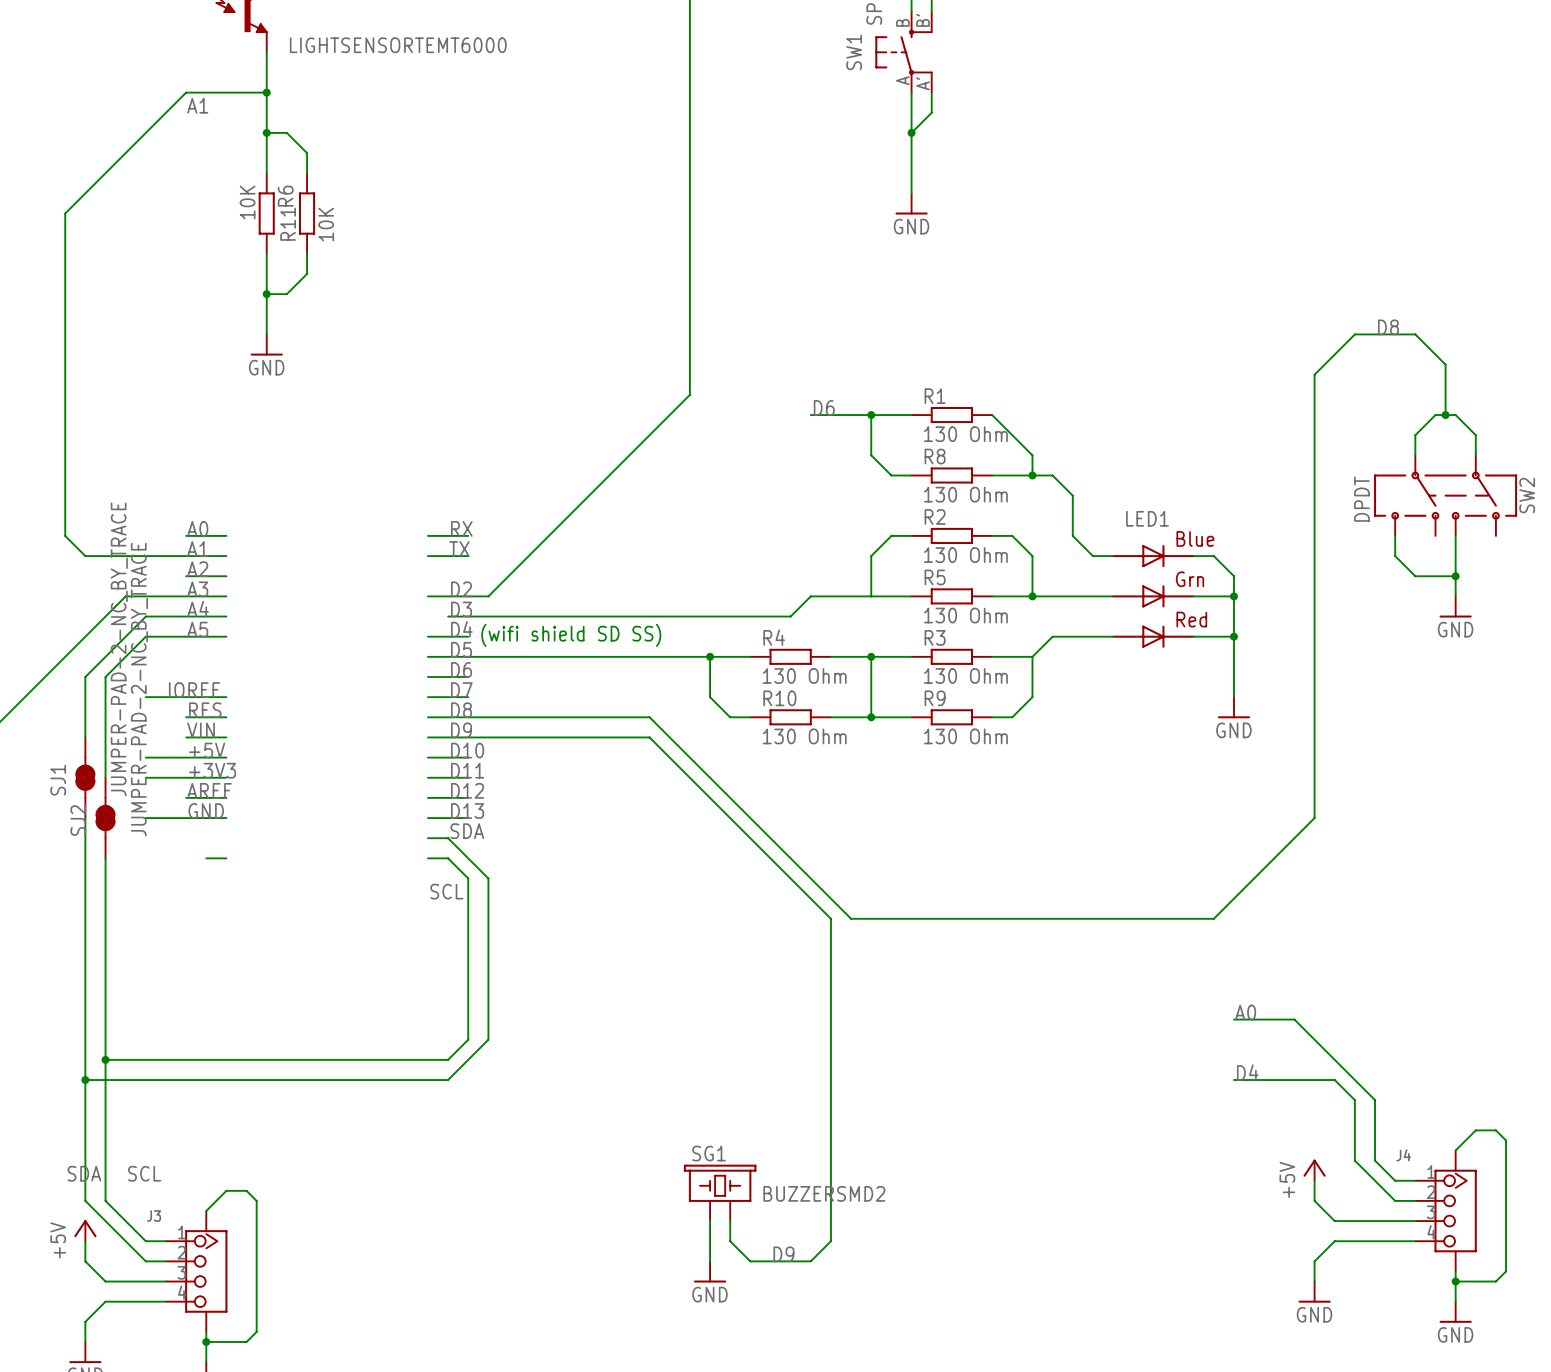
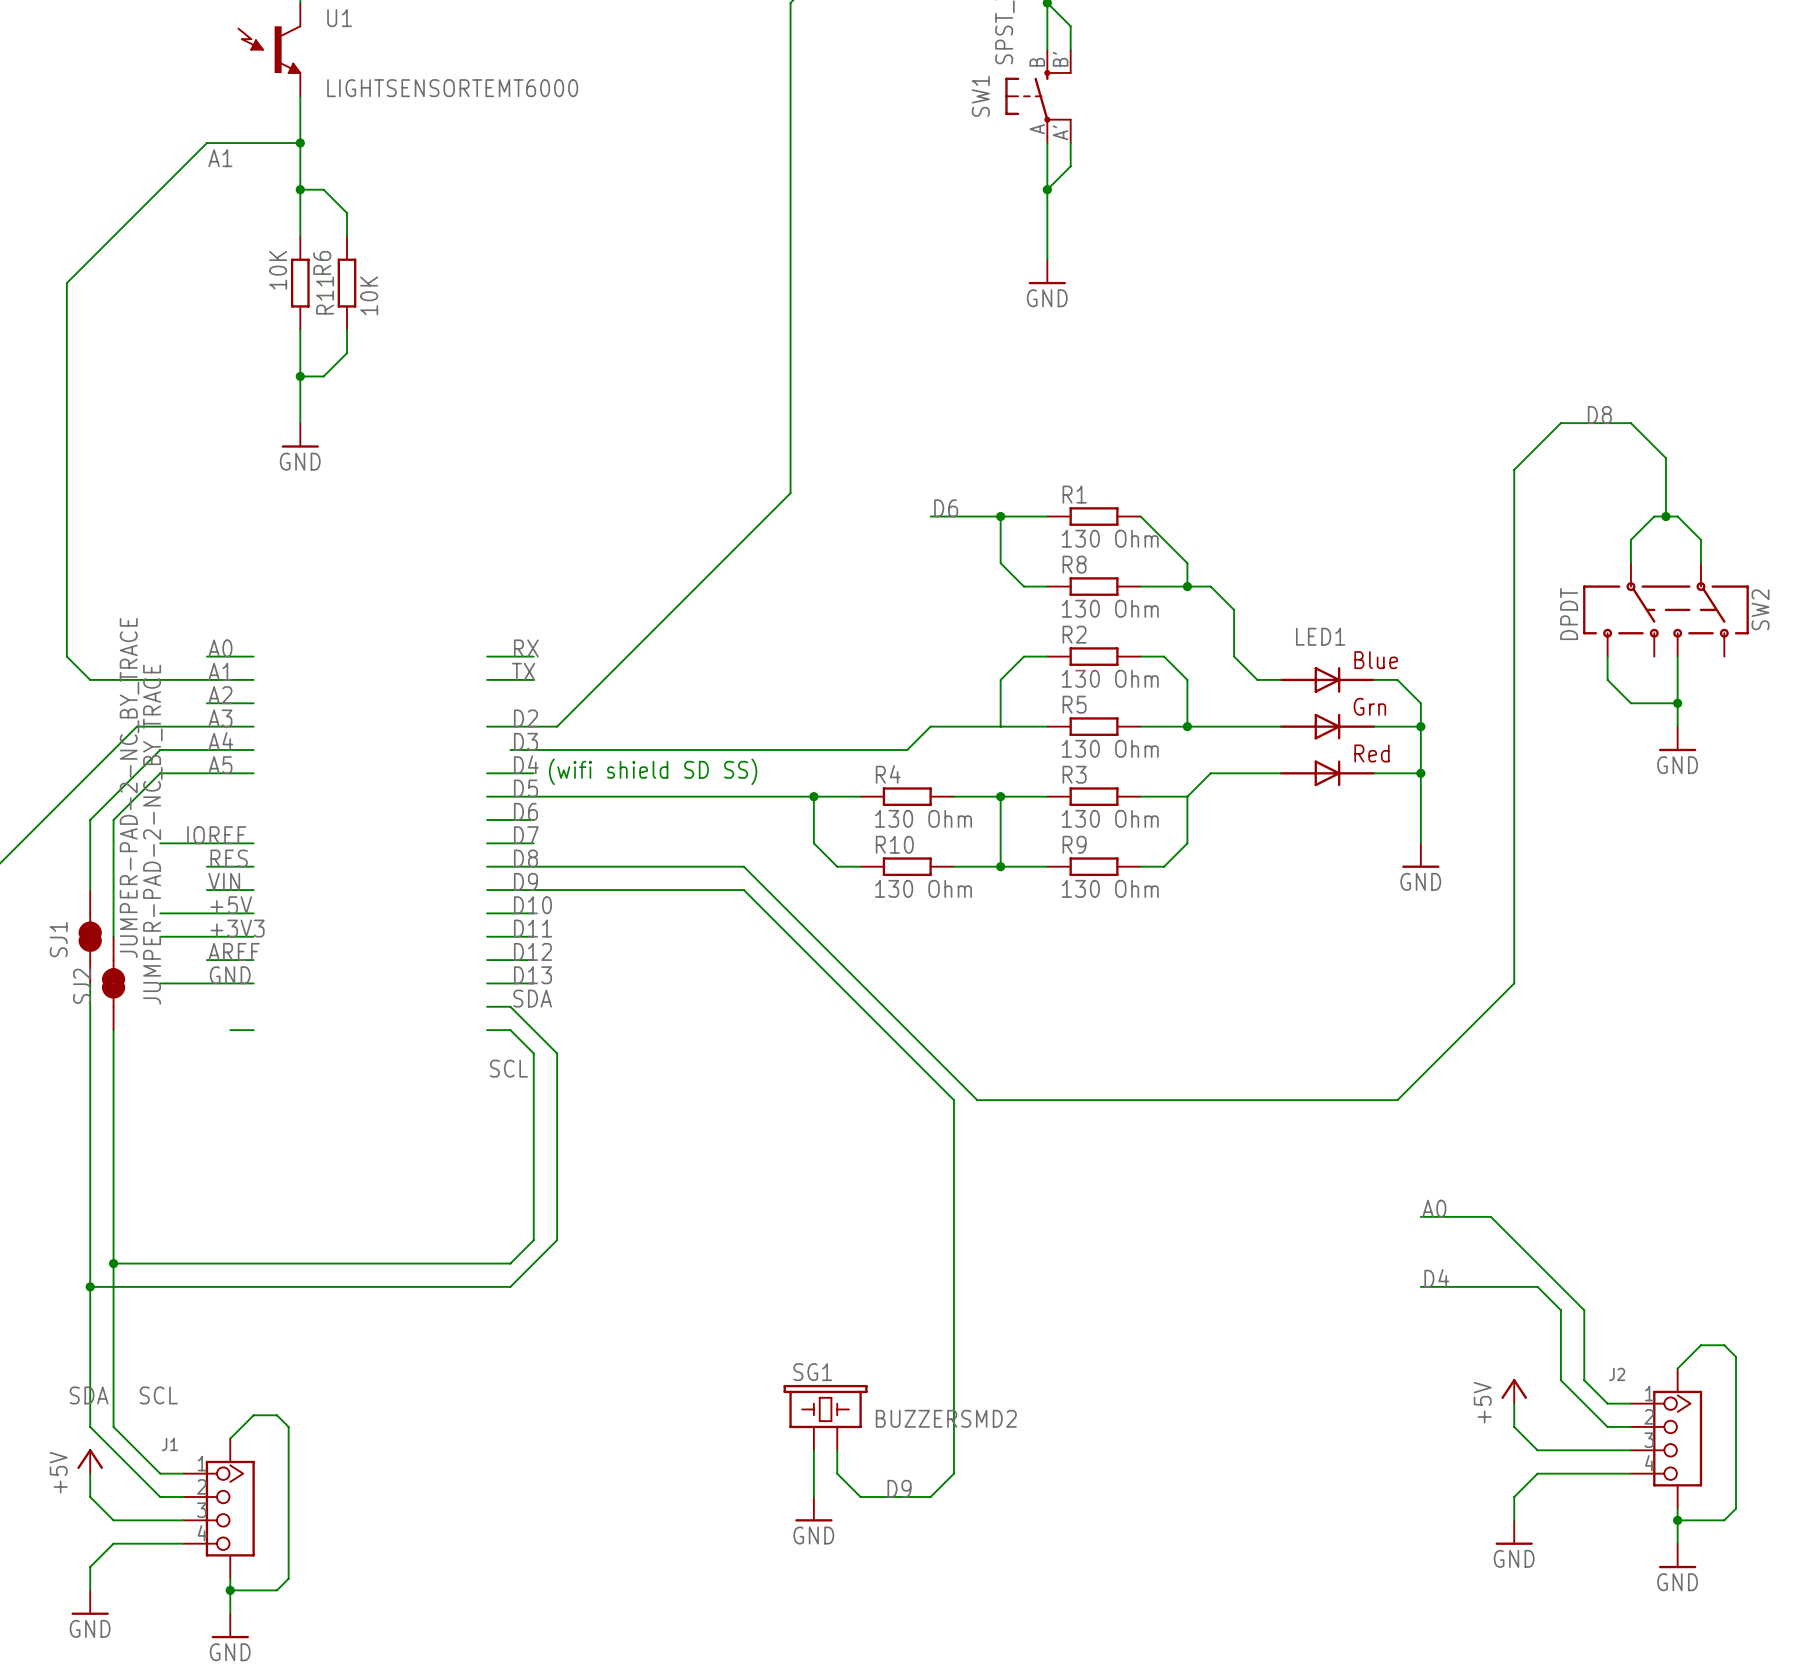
J4 name: J4 (1403, 1155) -> J2 (1617, 1374)
J3 name: J3 (154, 1216) -> J1 (169, 1444)

